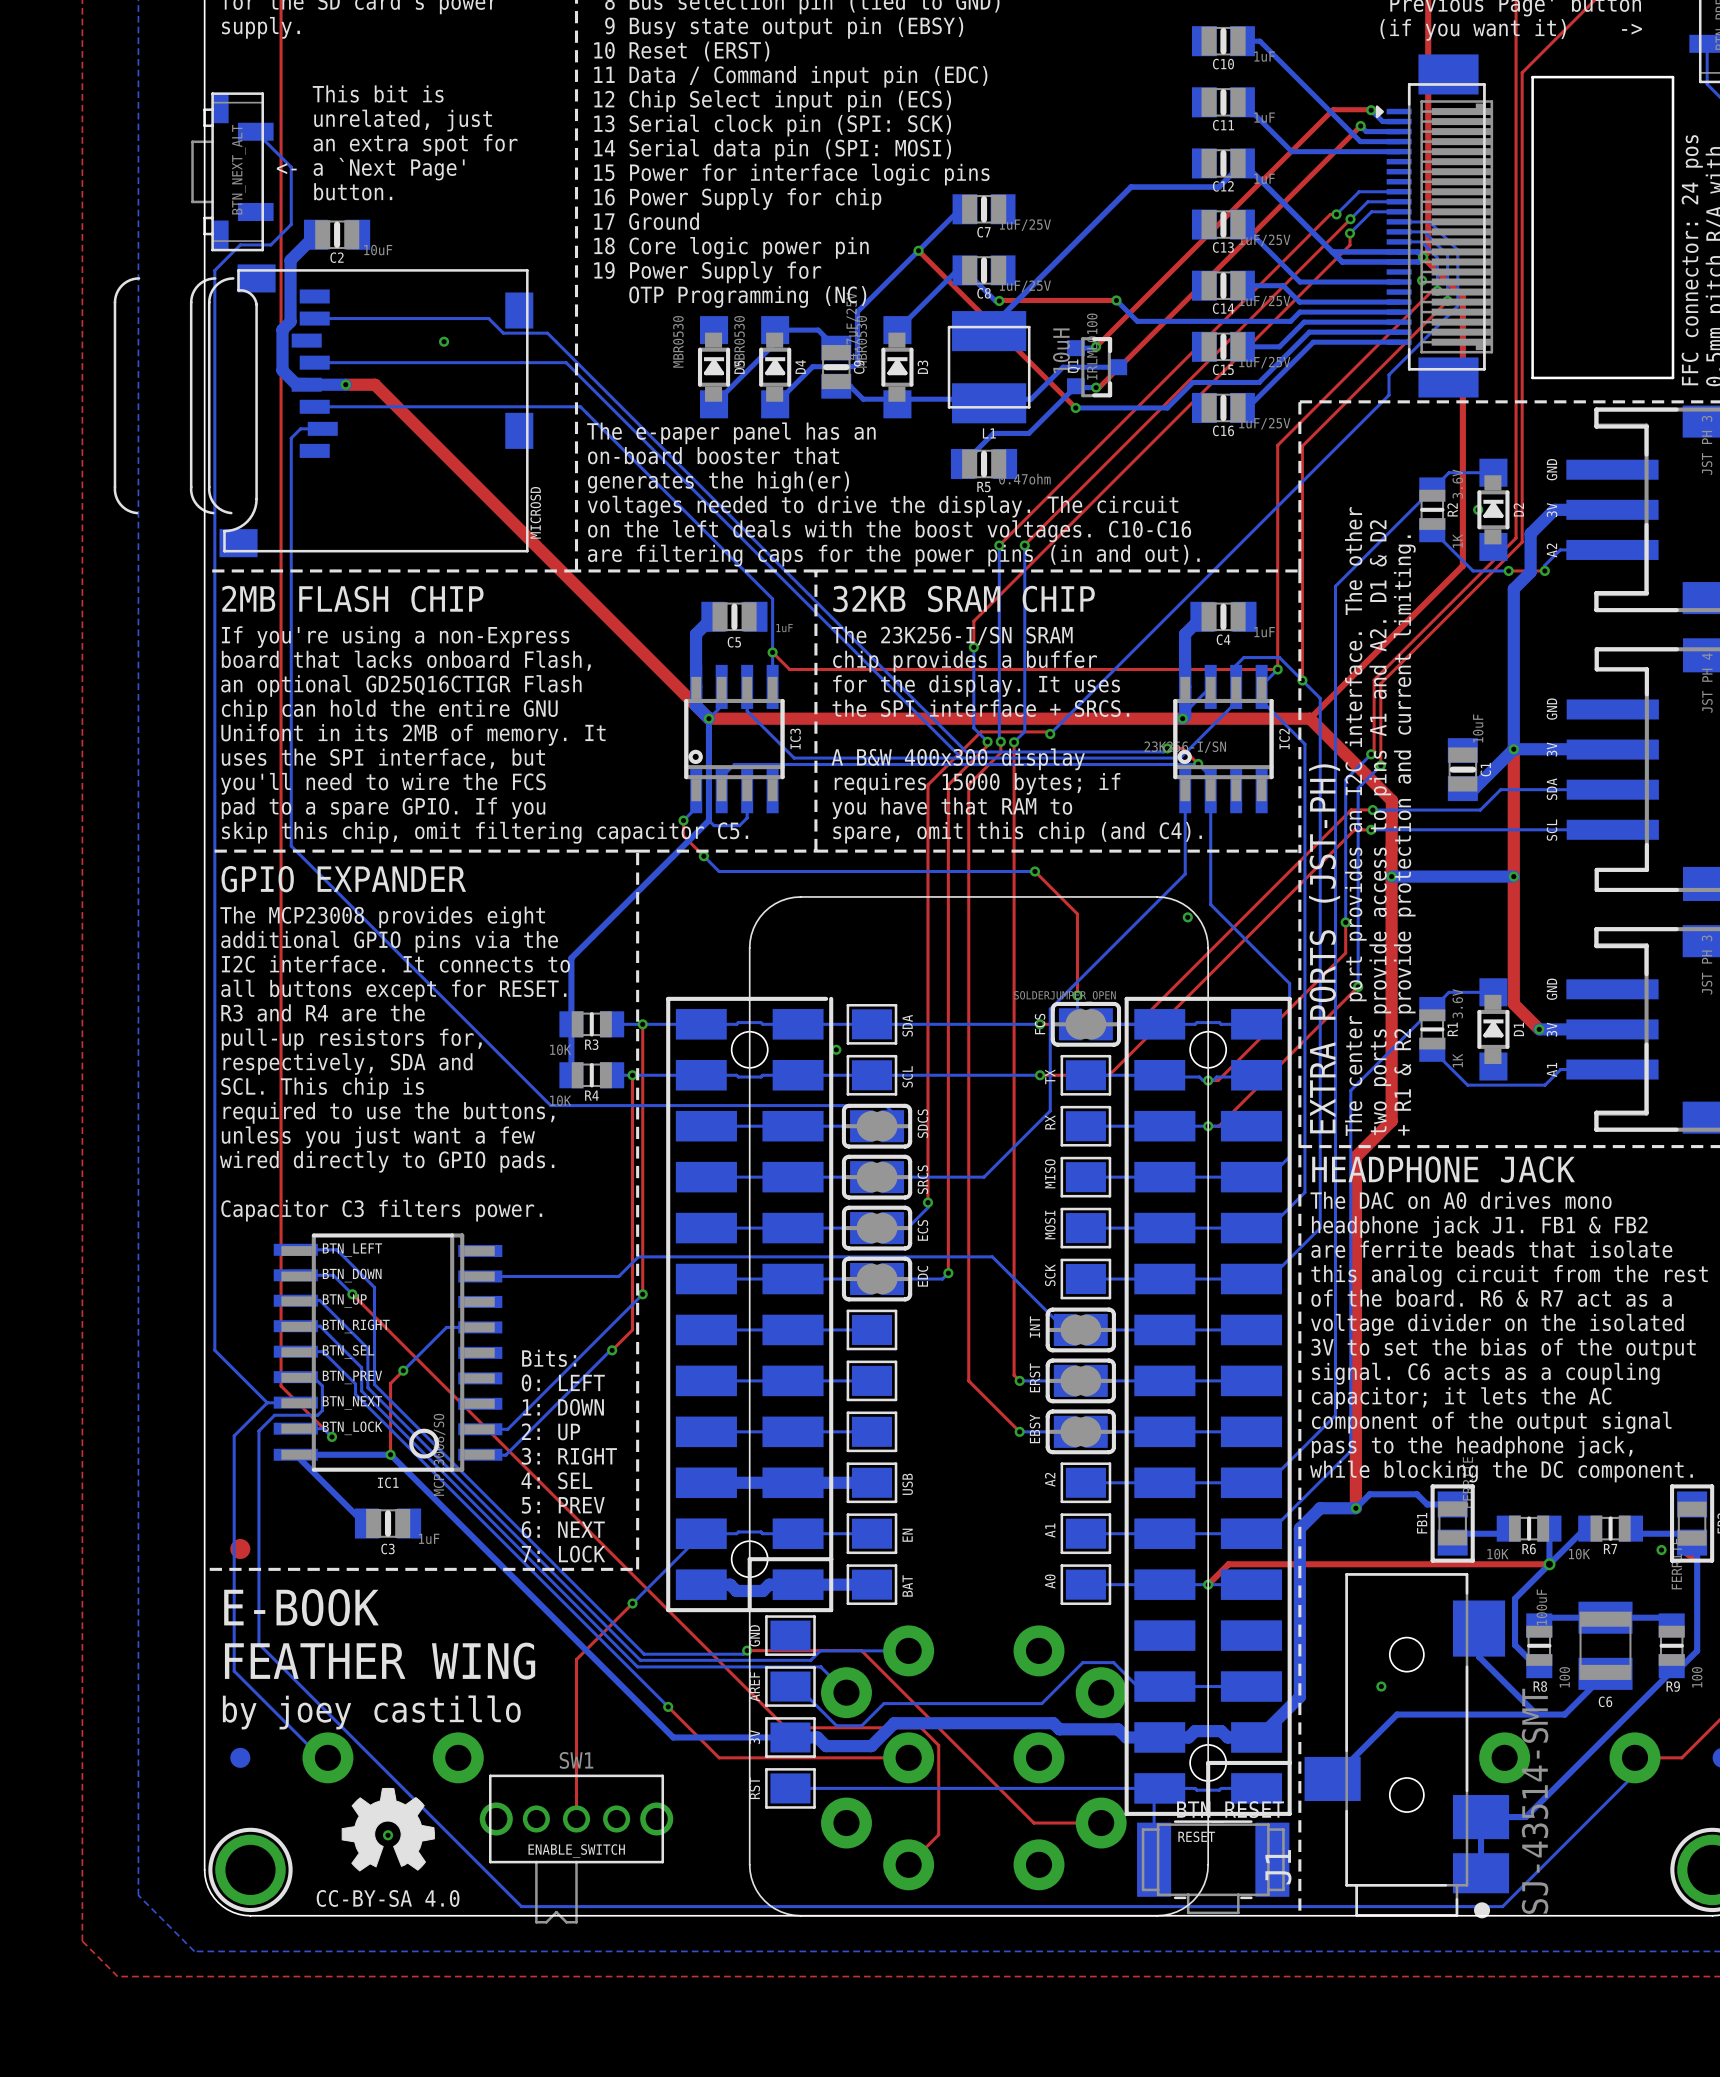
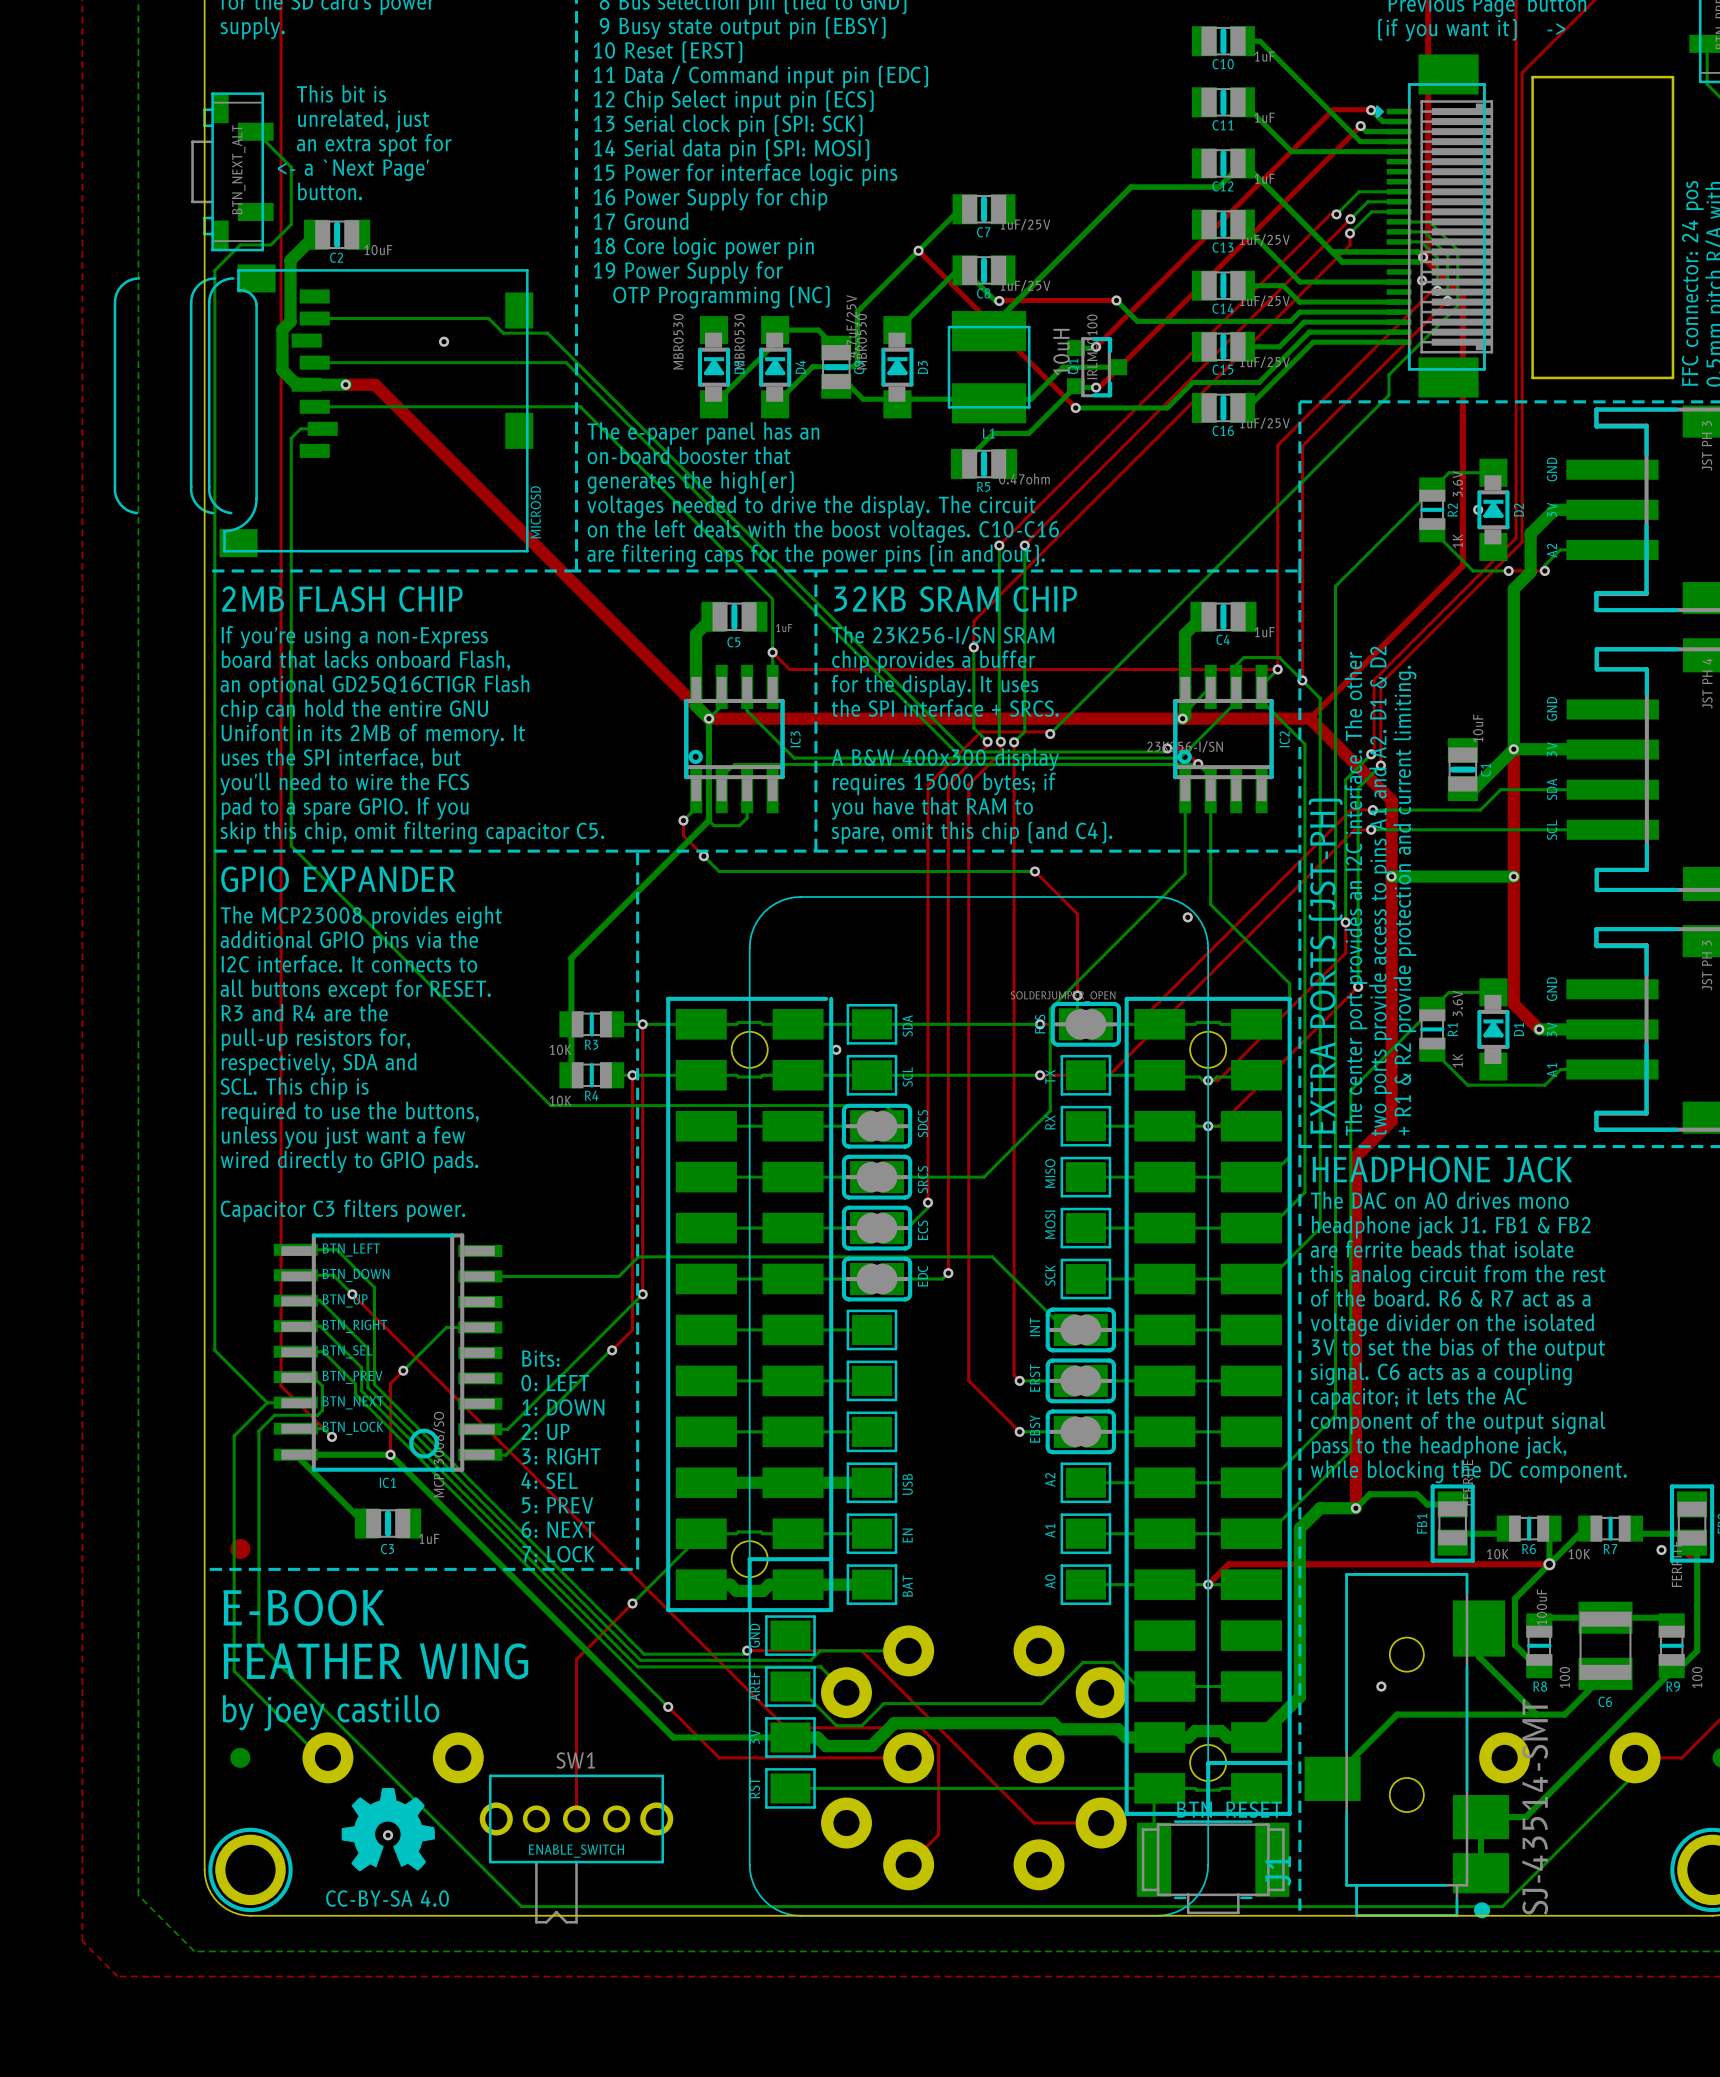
text: RESET (1196, 1836) -> none

